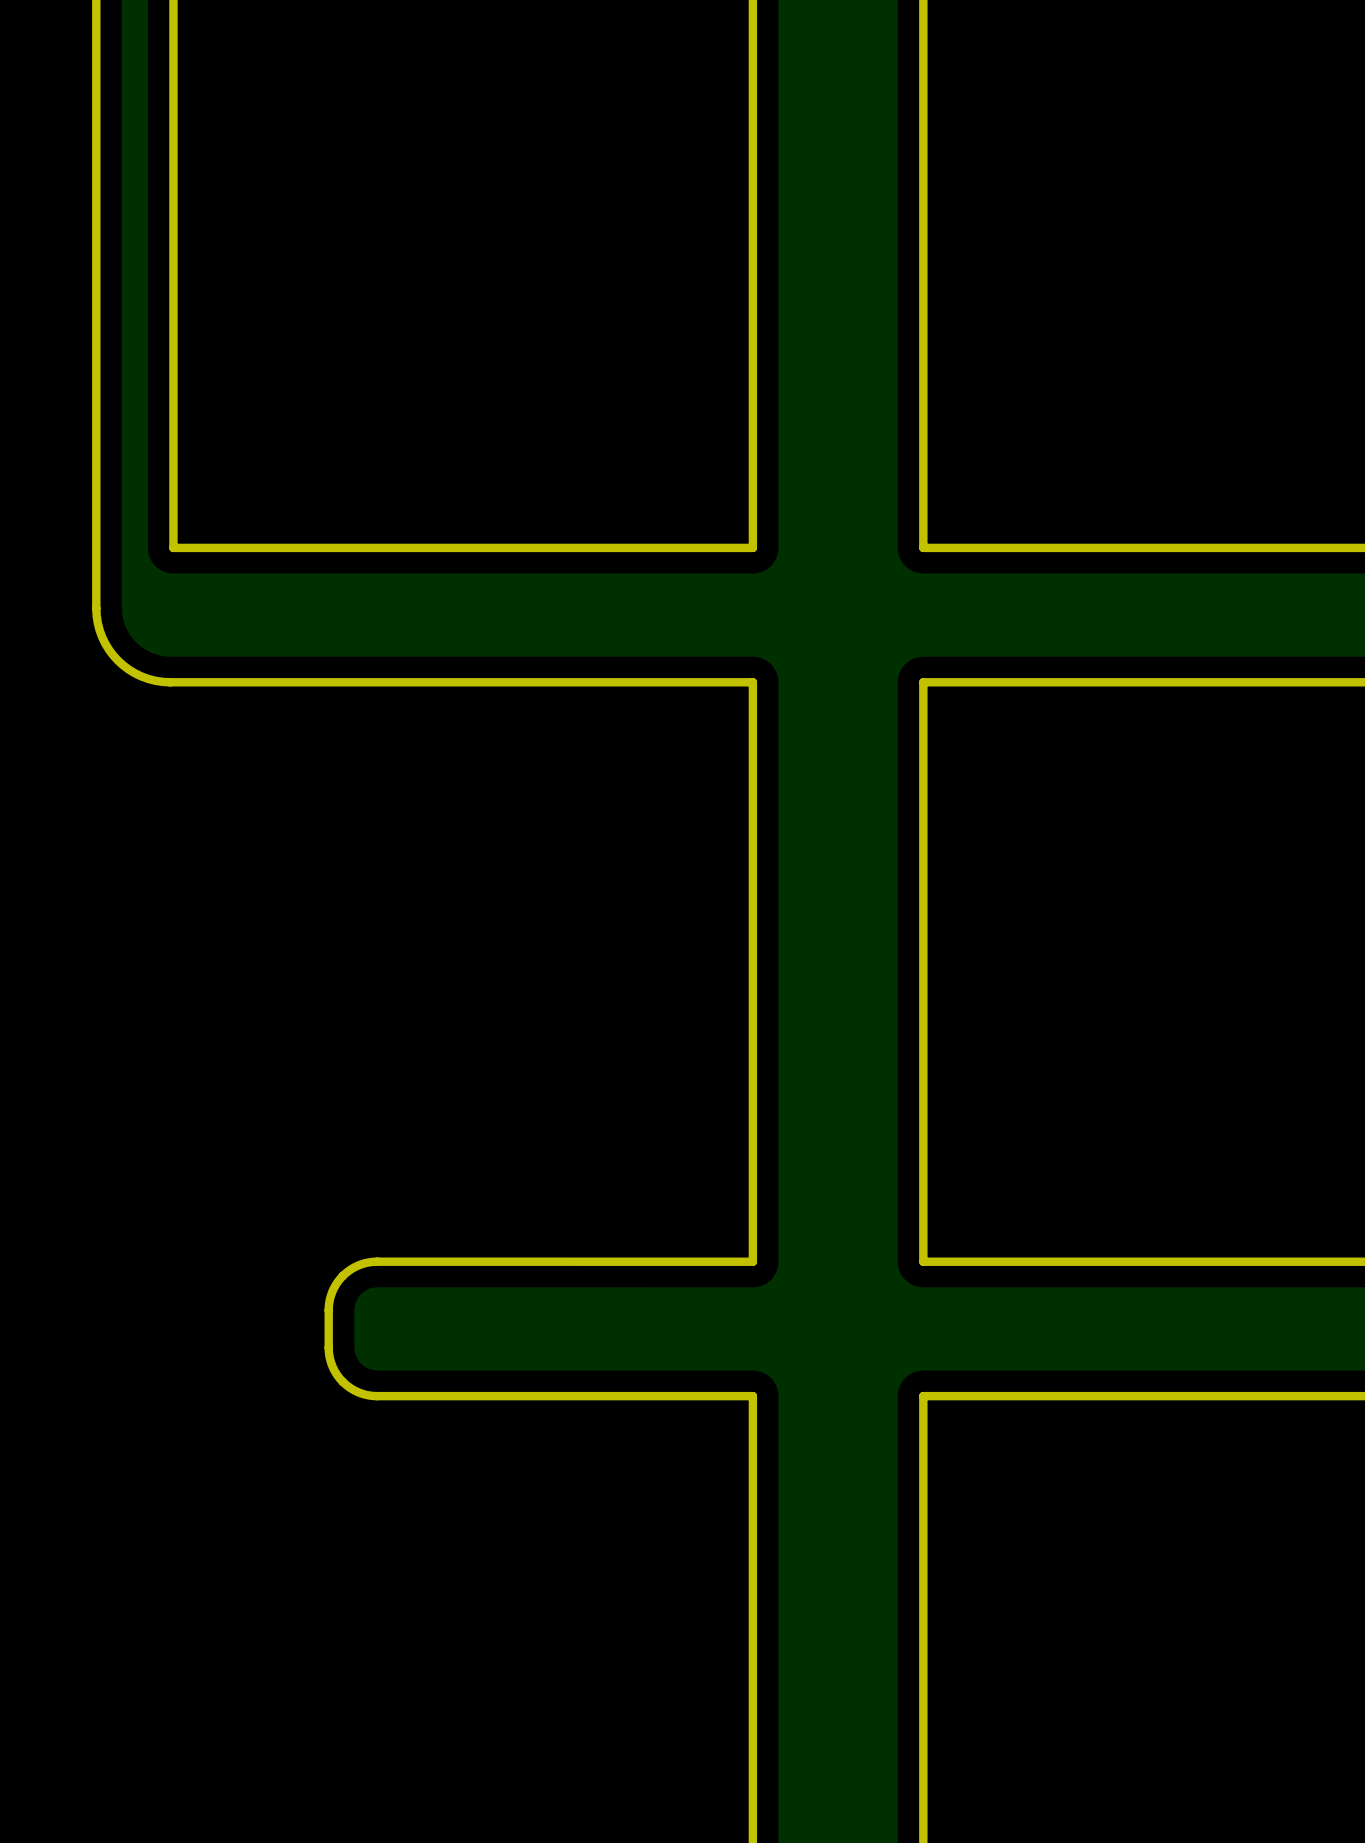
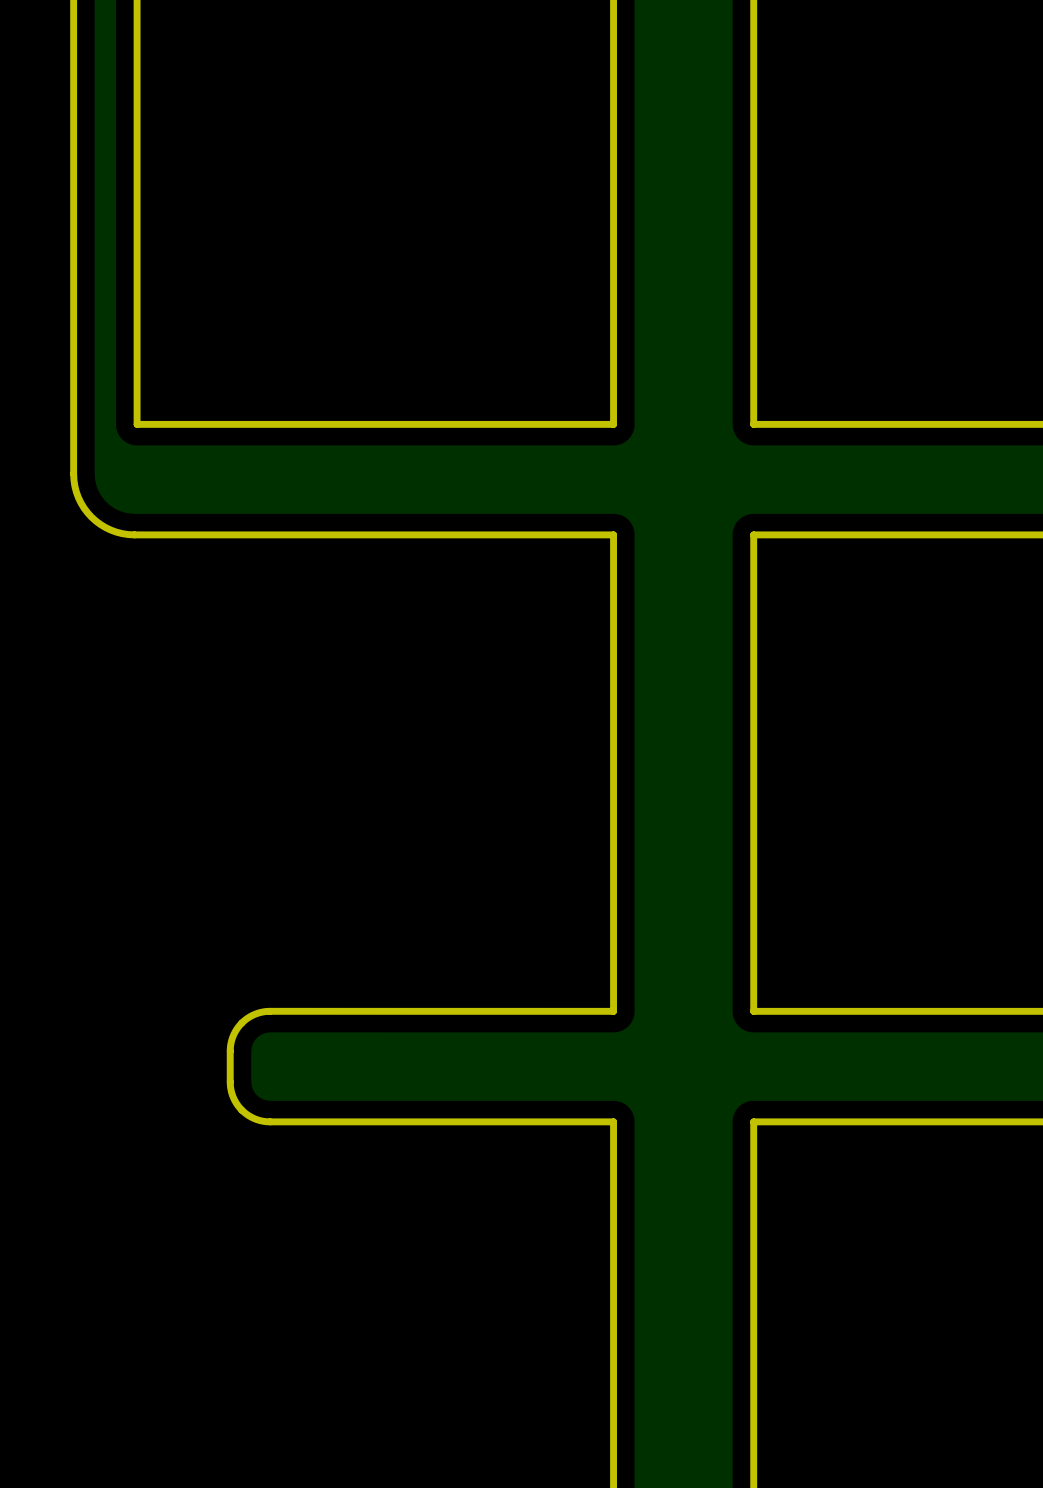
board edge: (752, 1261) (377, 1261) (360, 1264) (342, 1275) (331, 1293) (328, 1307) (329, 1354) (334, 1370) (344, 1383) (360, 1393) (377, 1396) -> (613, 1011) (270, 1011) (253, 1015) (239, 1025) (231, 1041) (230, 1083) (234, 1099) (243, 1111) (258, 1120) (304, 1121)

